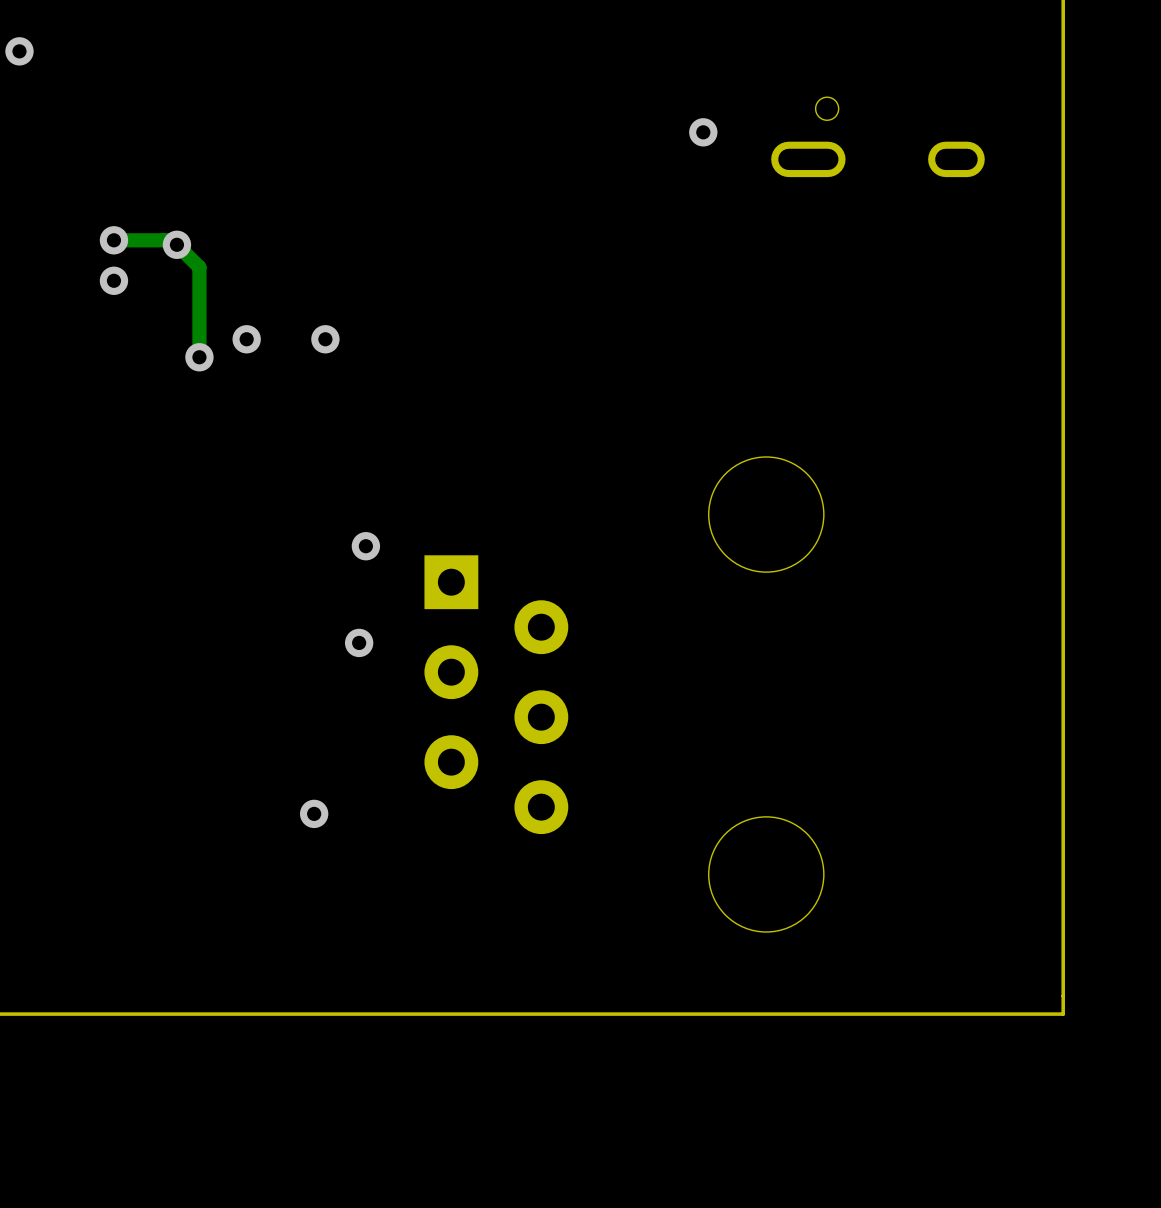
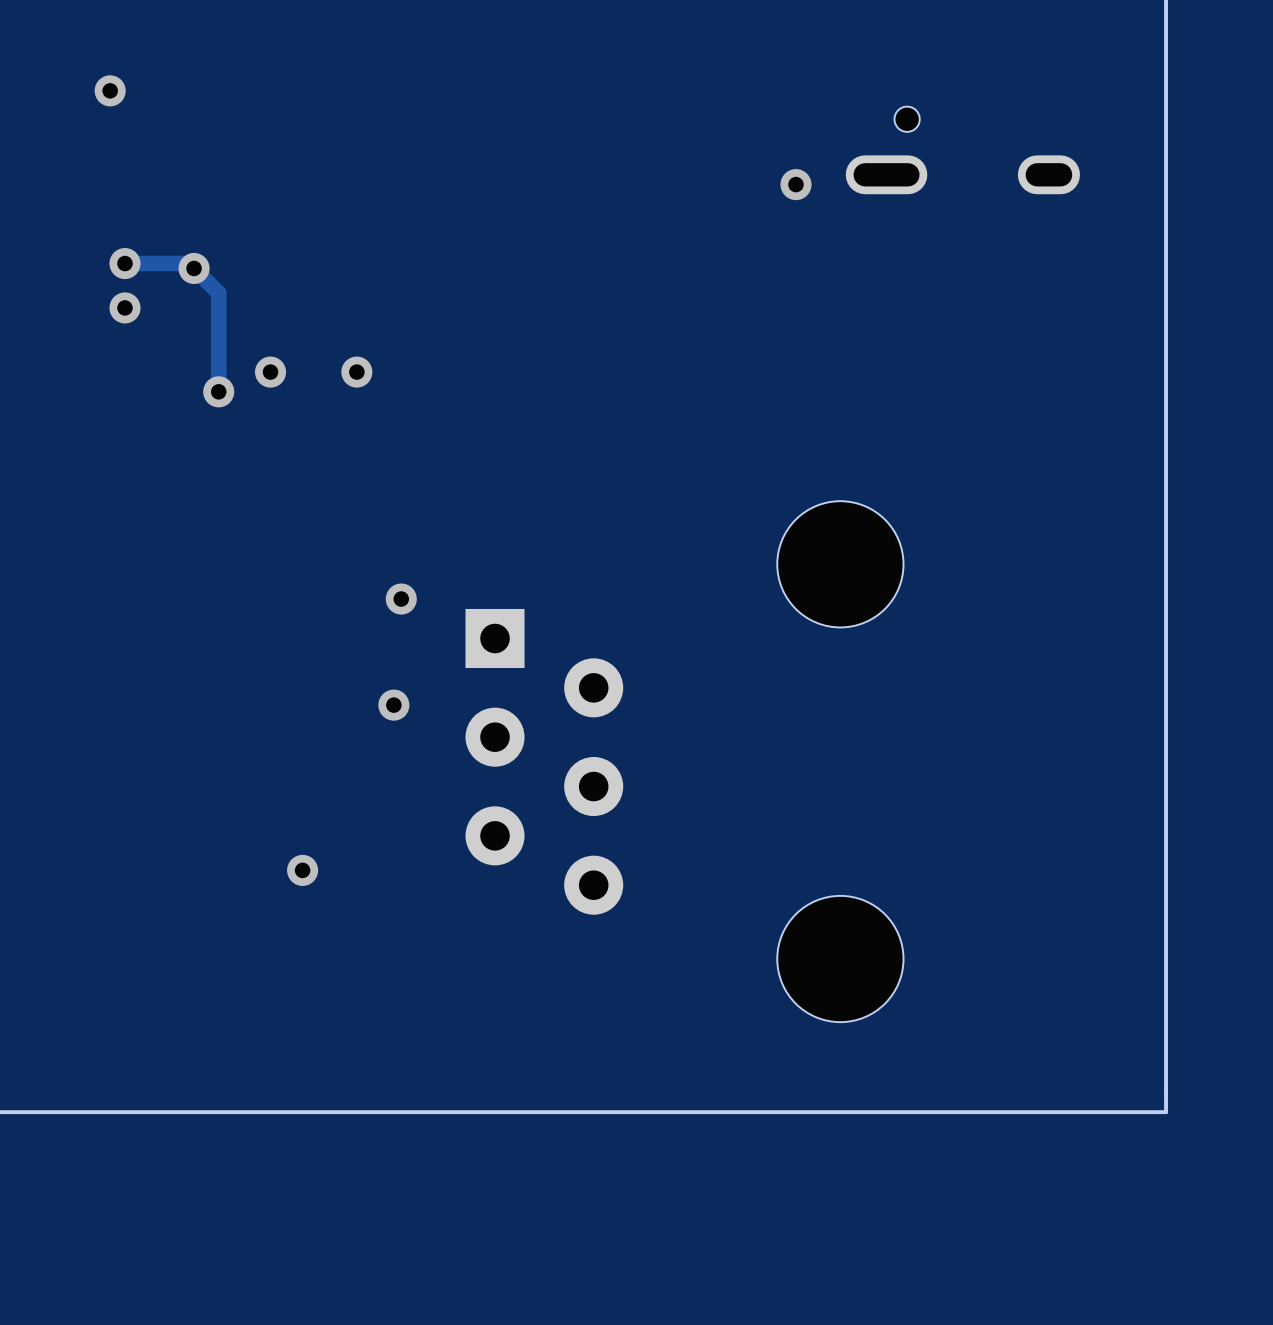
via: (19, 51) -> none
via: none -> (110, 90)
via position: (703, 132) -> (795, 184)
via position: (314, 813) -> (302, 870)

